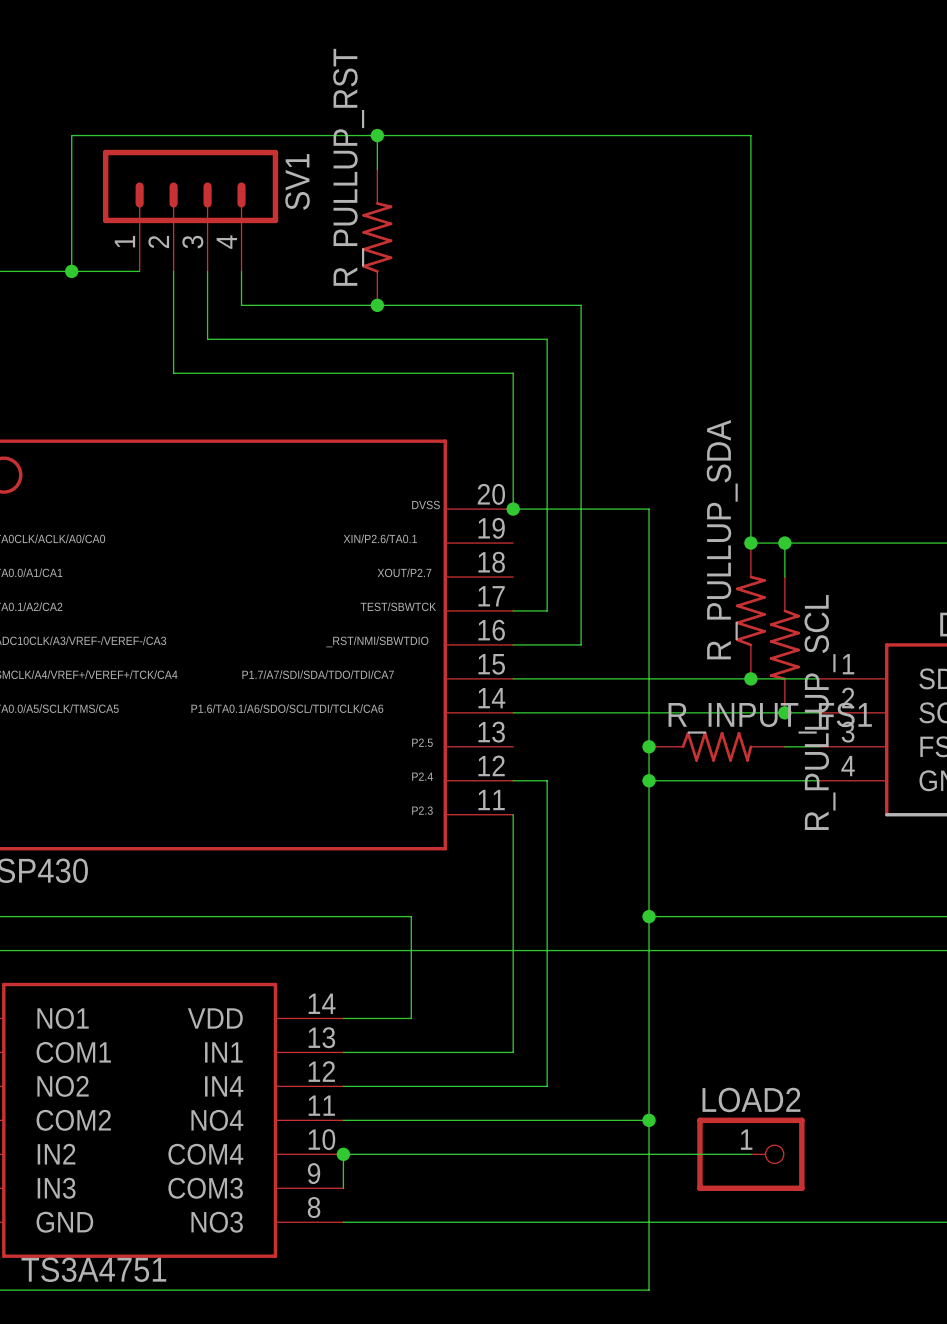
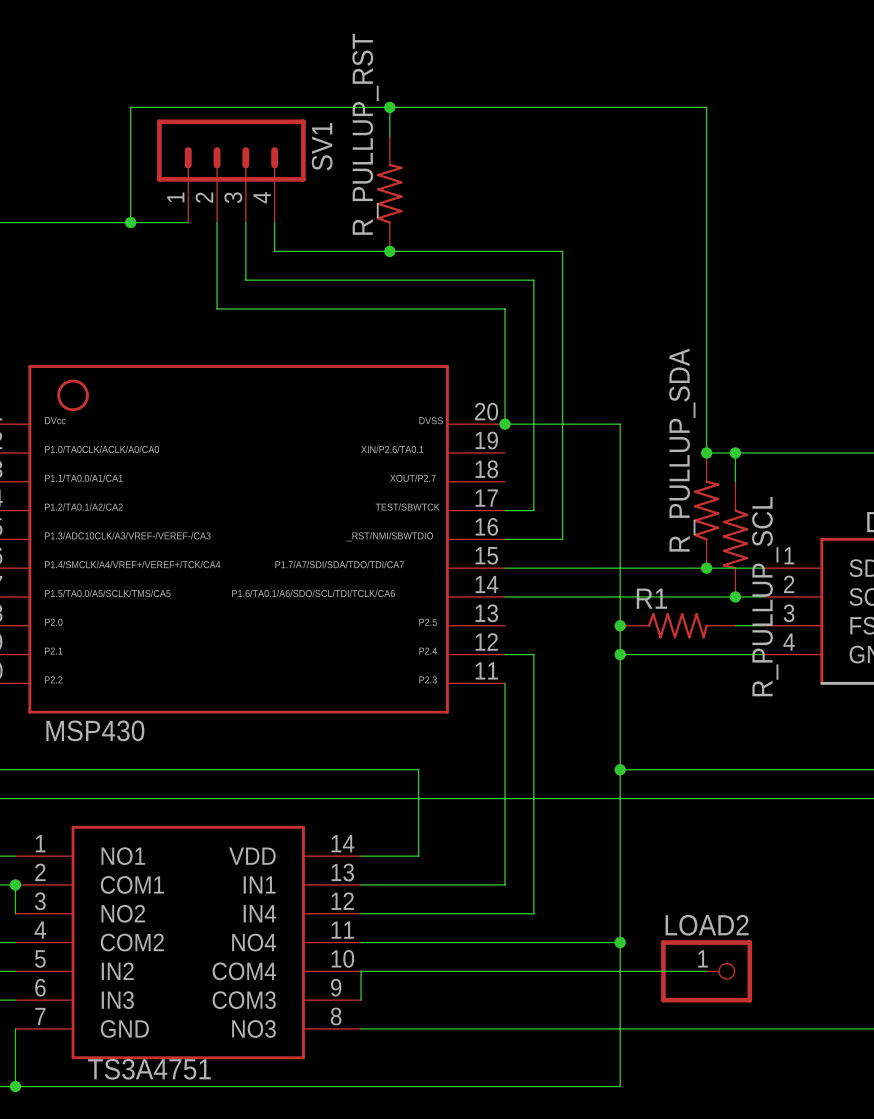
R_INPUT_FS1 name: R_INPUT_FS1 (770, 718) -> R1 (651, 598)
junction: (343, 1154) -> none

